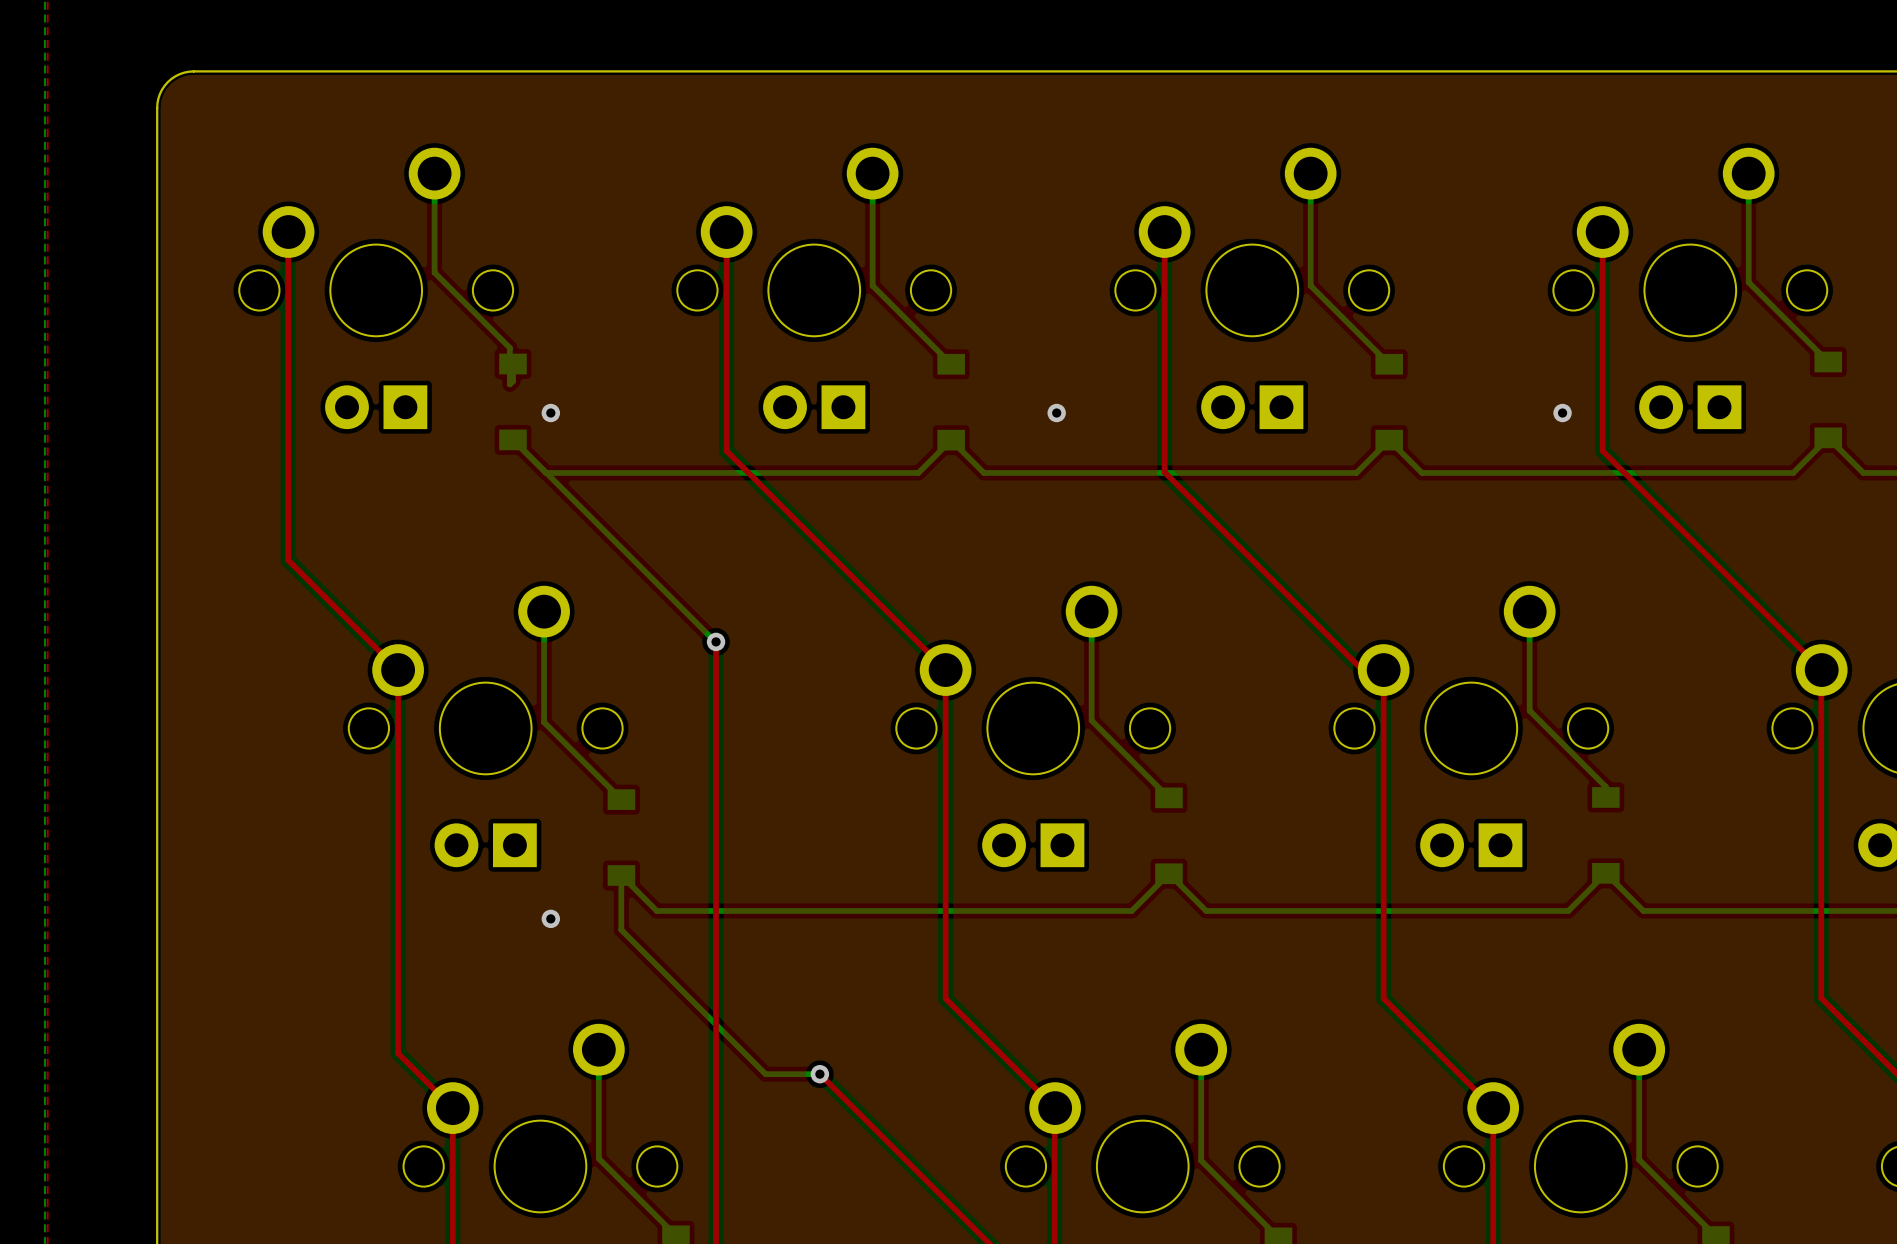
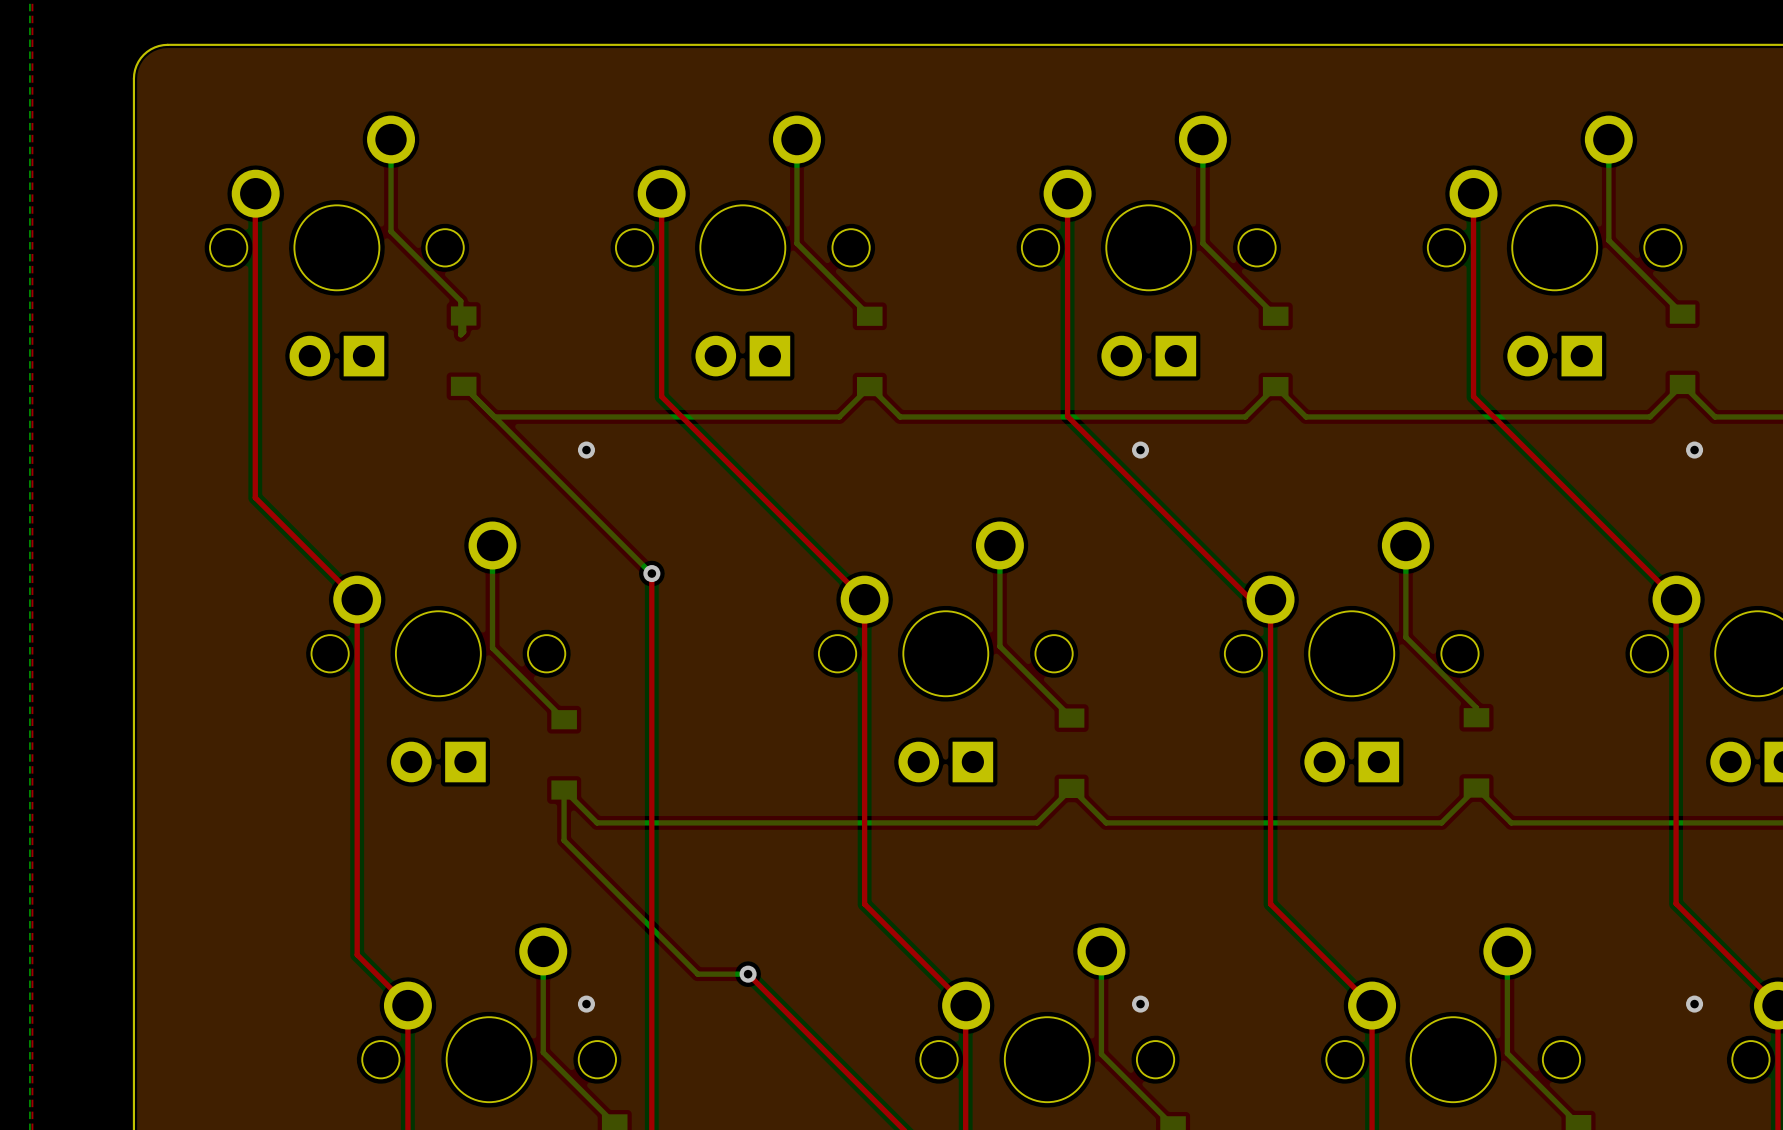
via position: (550, 413) -> (586, 450)
via: (1056, 413) -> none
via: (1562, 413) -> none
via: none -> (1140, 450)
via: none -> (1694, 450)
via: (550, 918) -> none
via: none -> (586, 1004)
via: none -> (1140, 1004)
via: none -> (1694, 1004)

